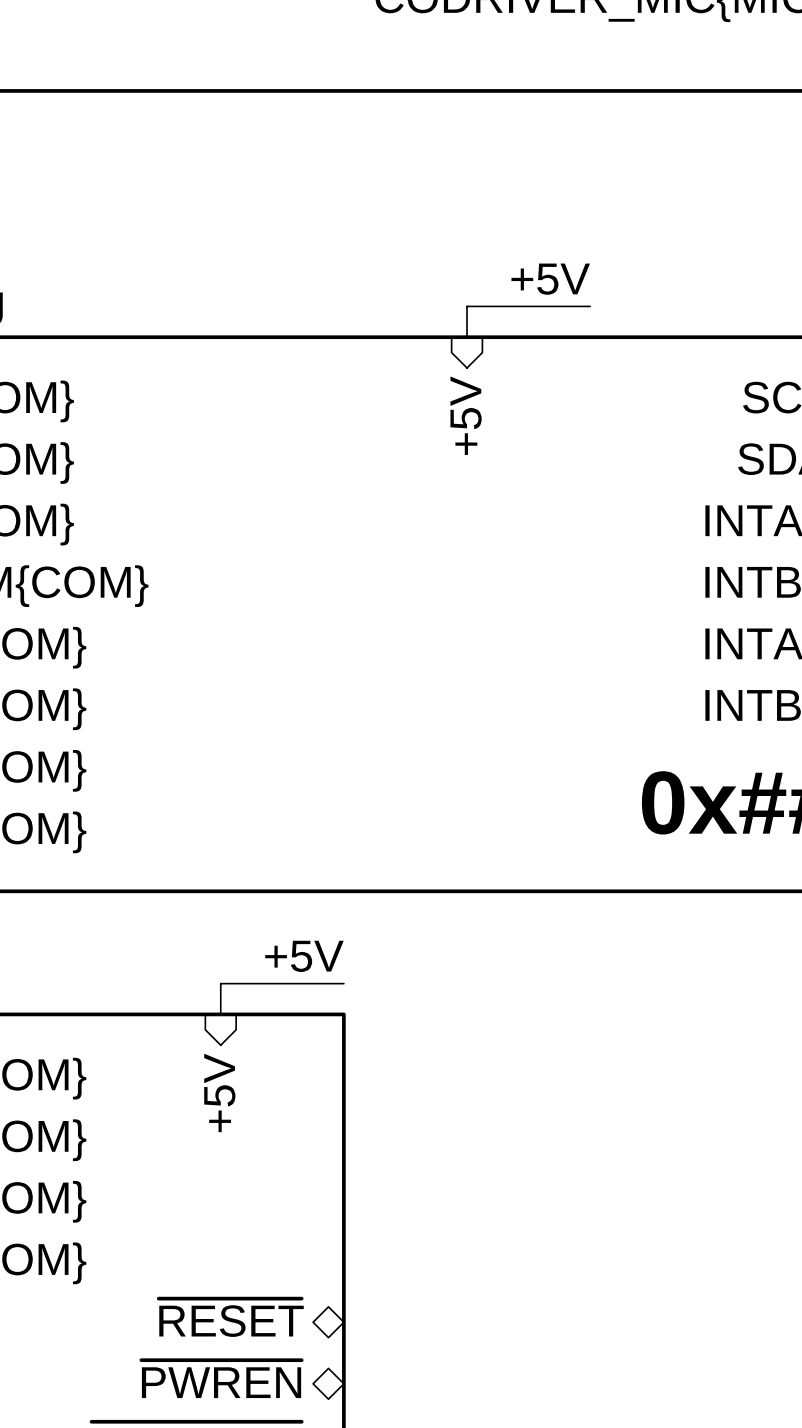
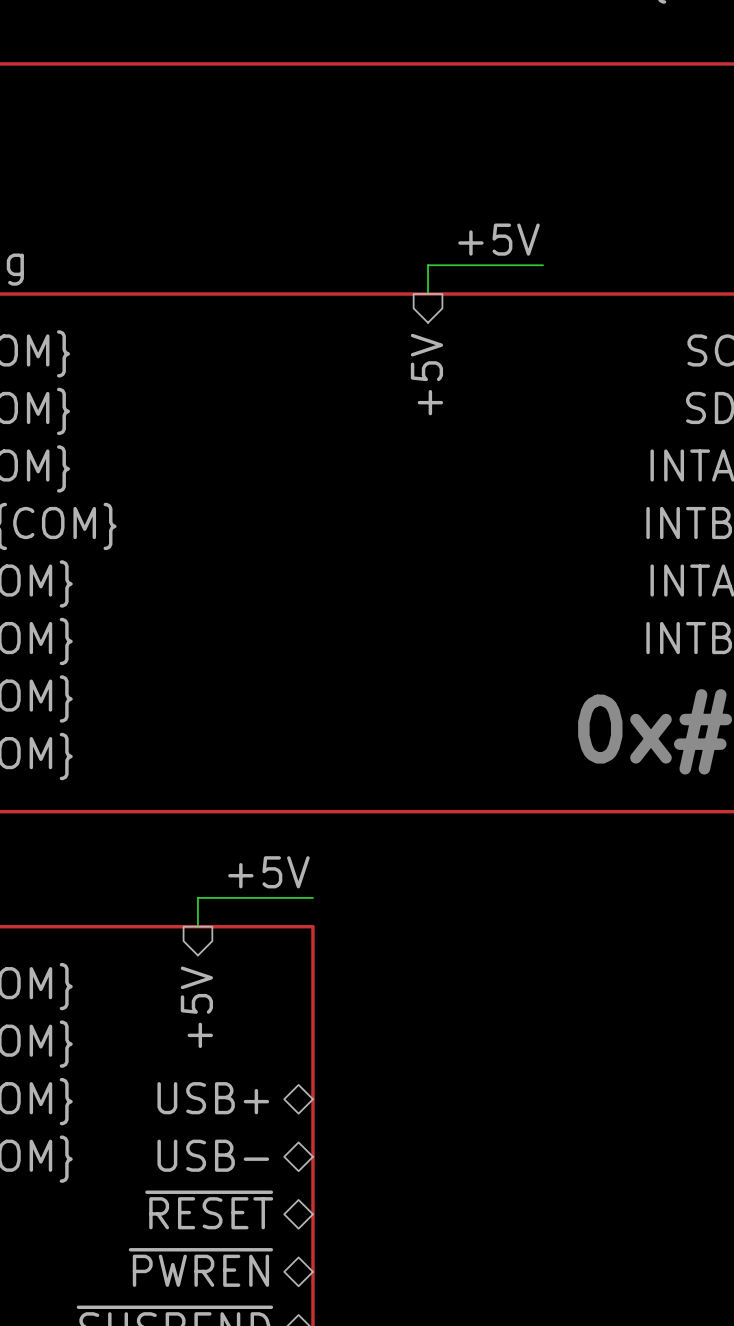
sheet pin: none -> USB+ (213, 1098)
sheet pin: none -> USB- (213, 1155)

